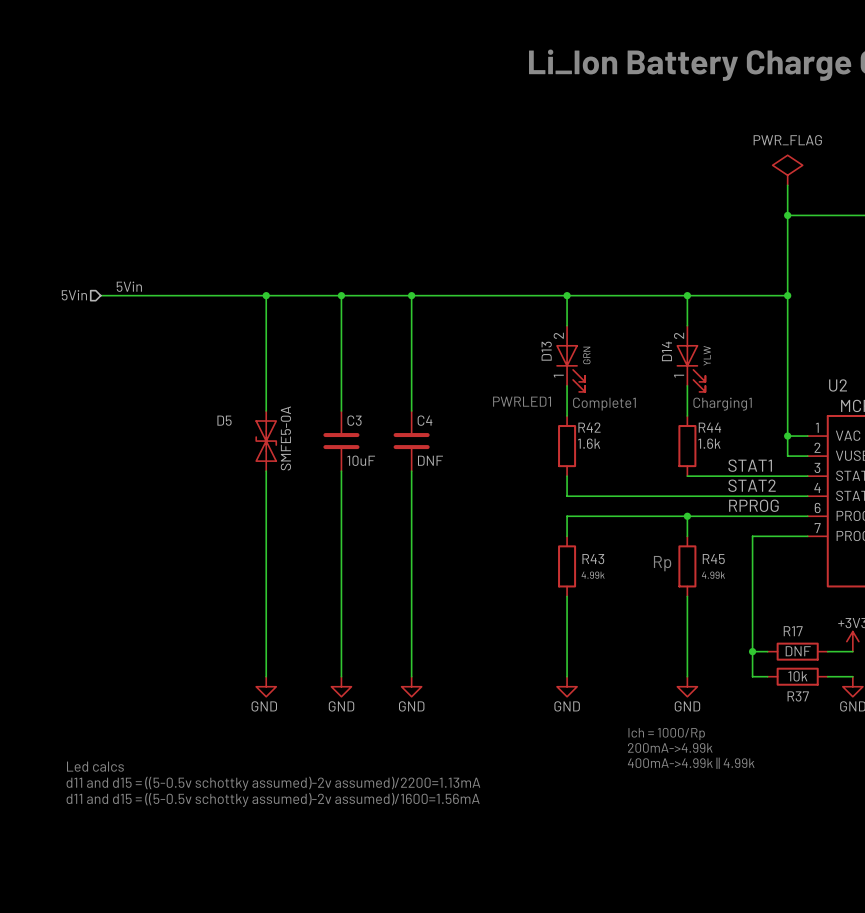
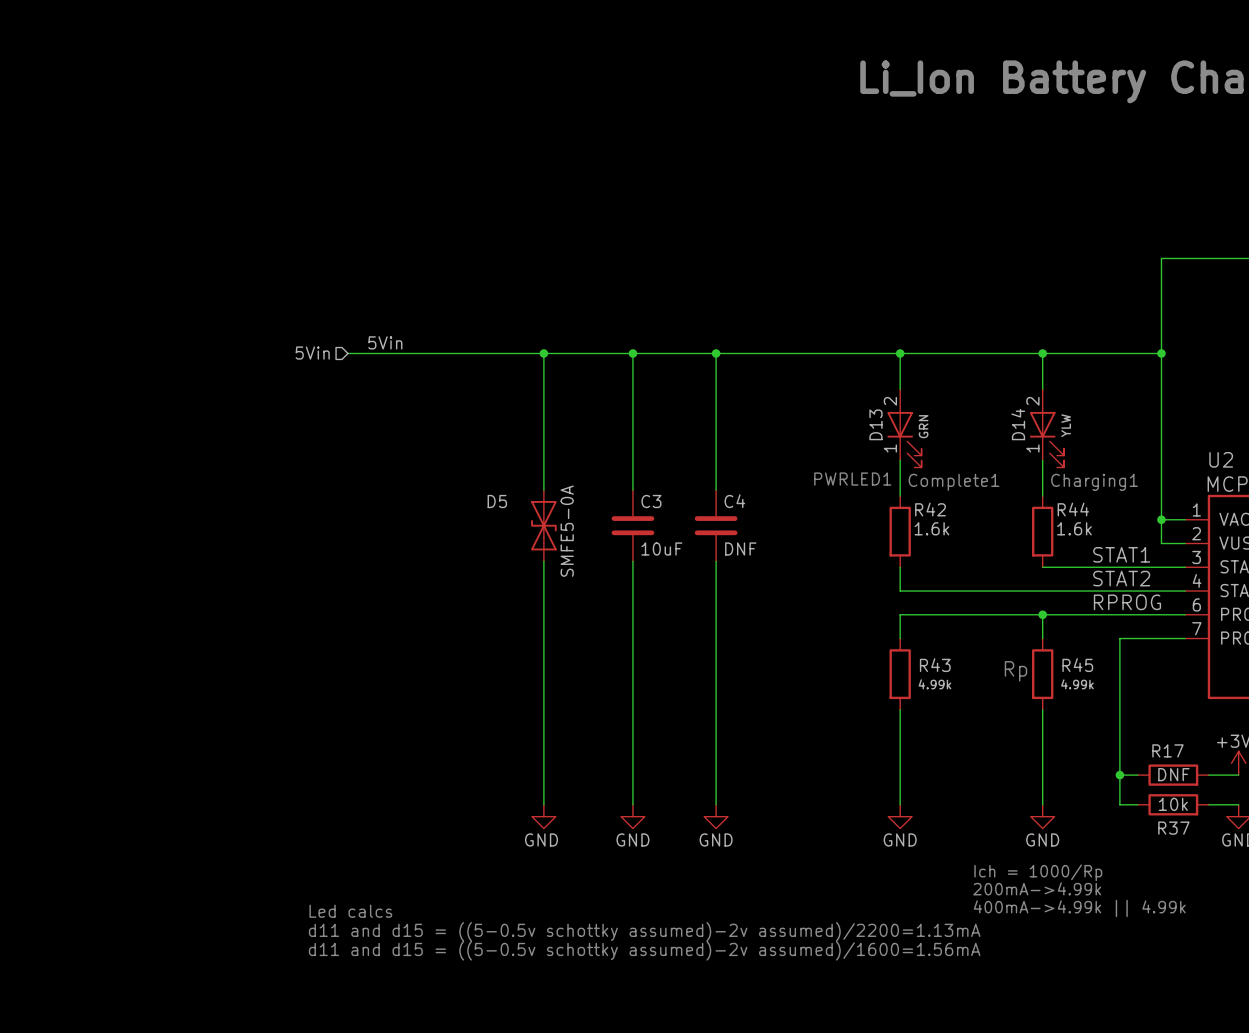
power symbol: PWR_FLAG (787, 170) -> none
wire: (787, 185) (787, 215) -> none
junction: (787, 215) -> none

